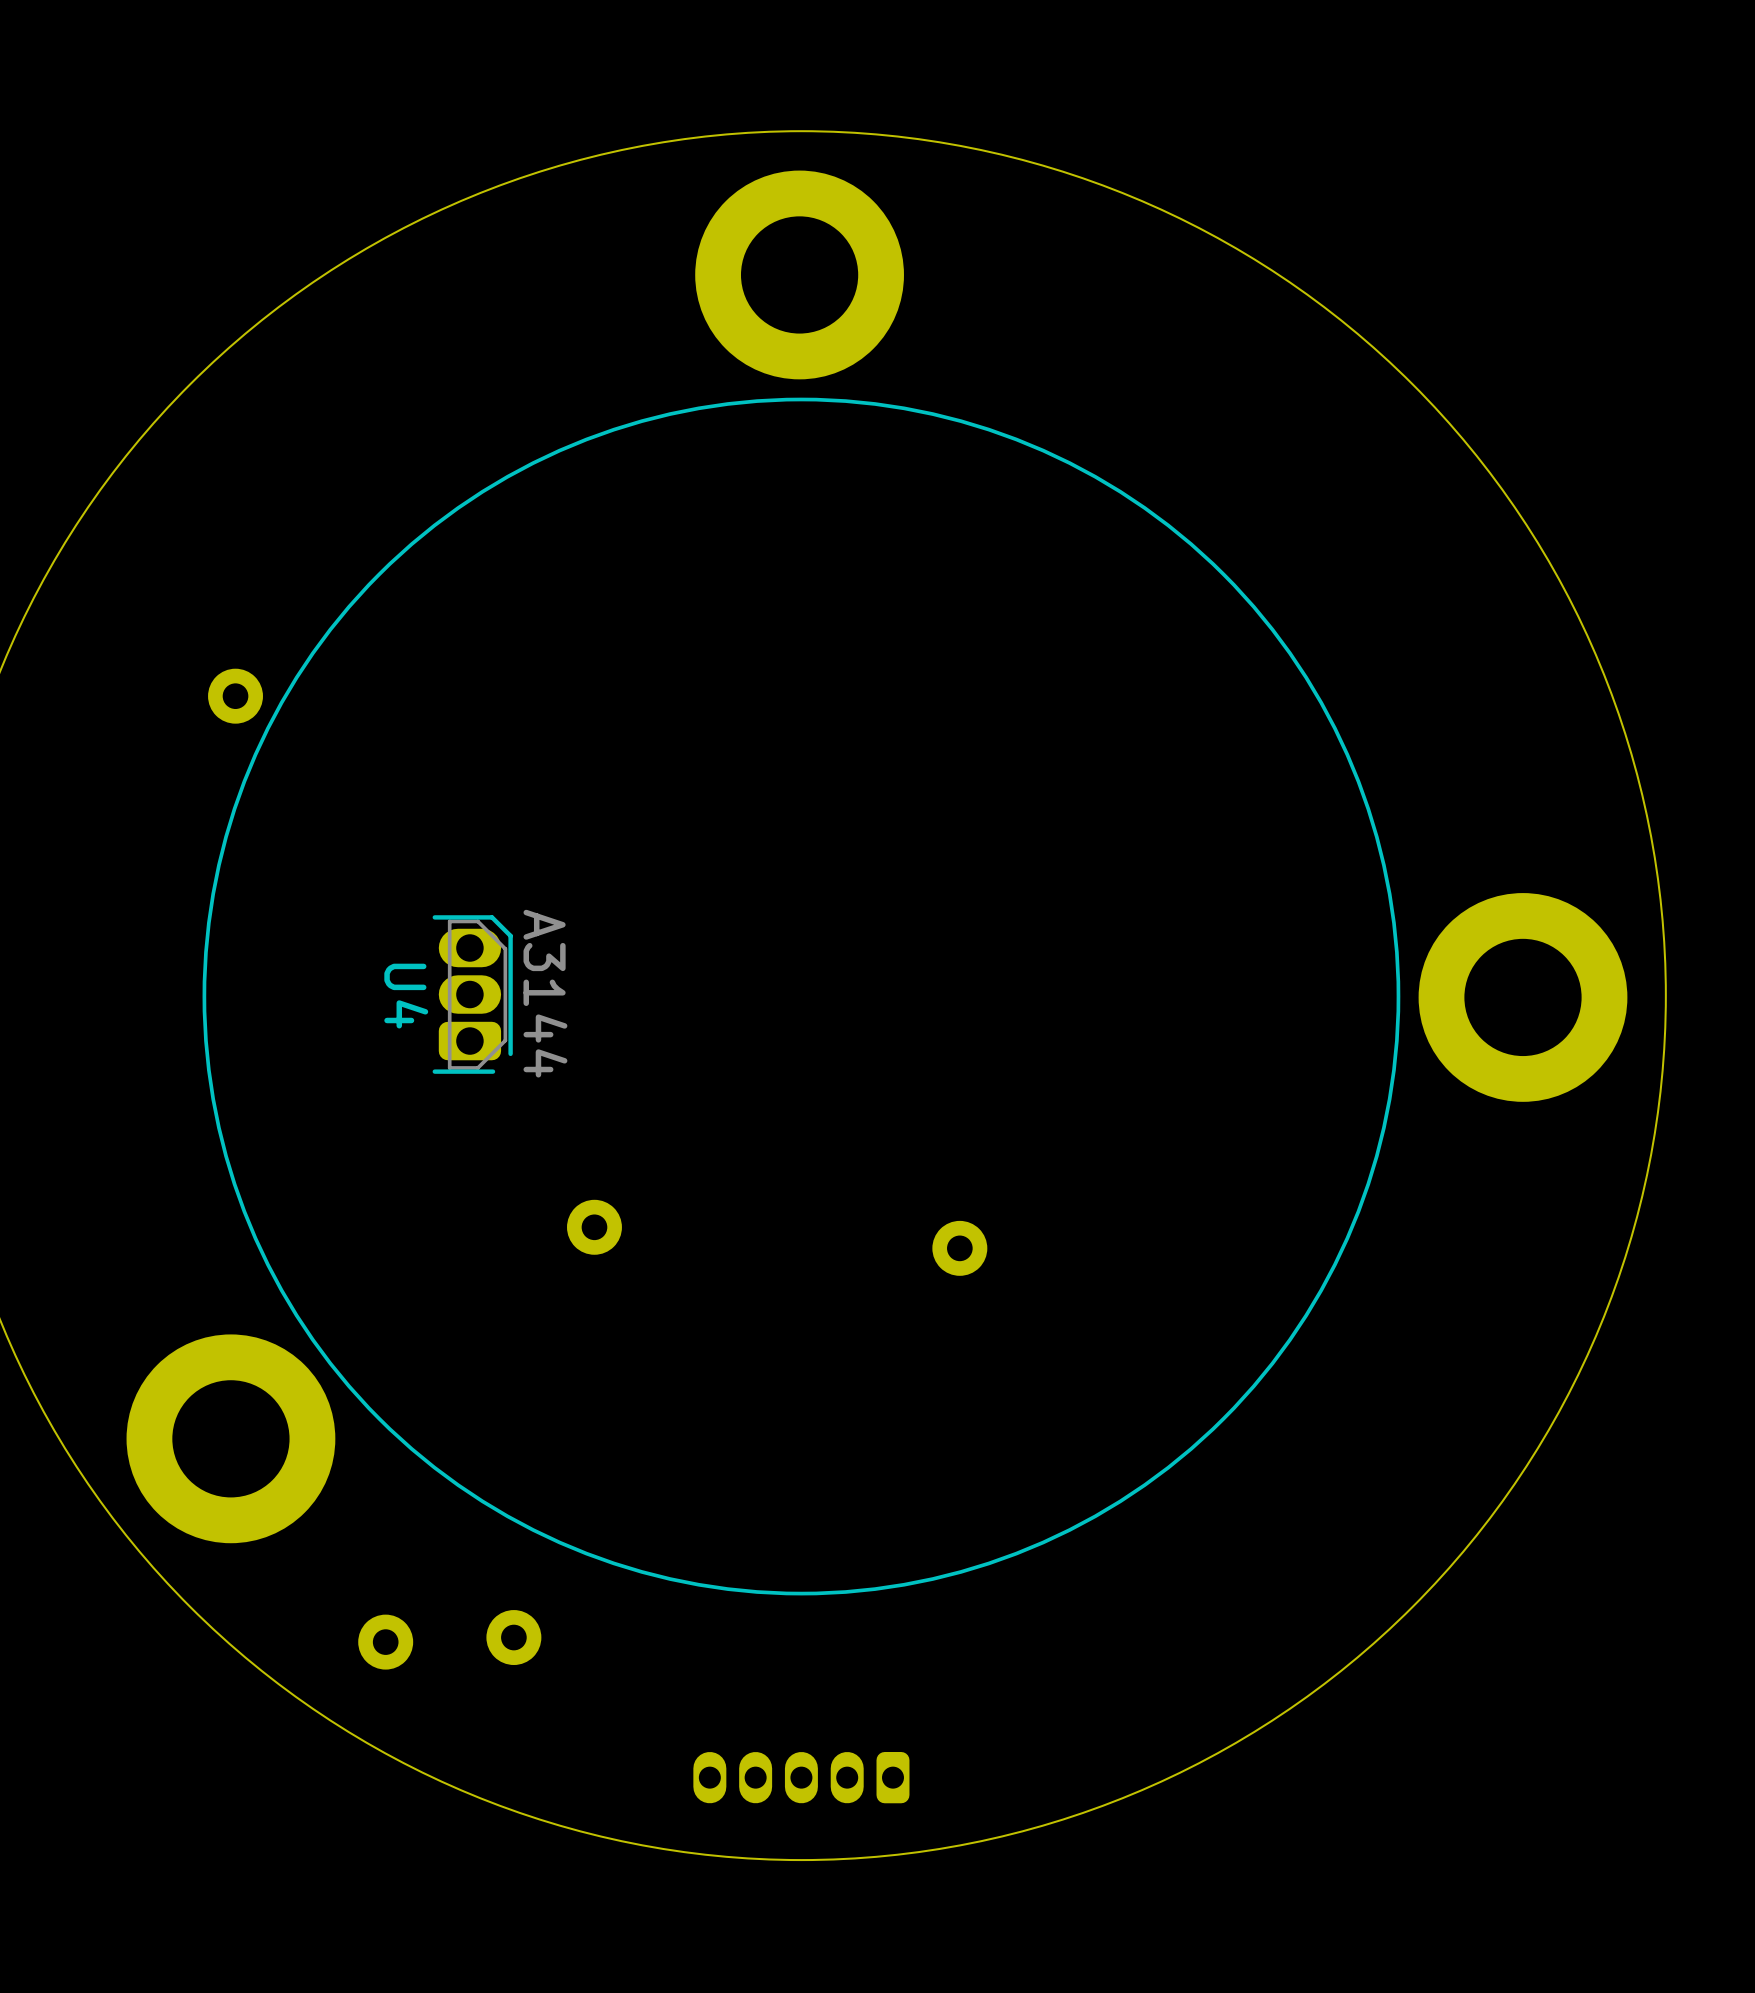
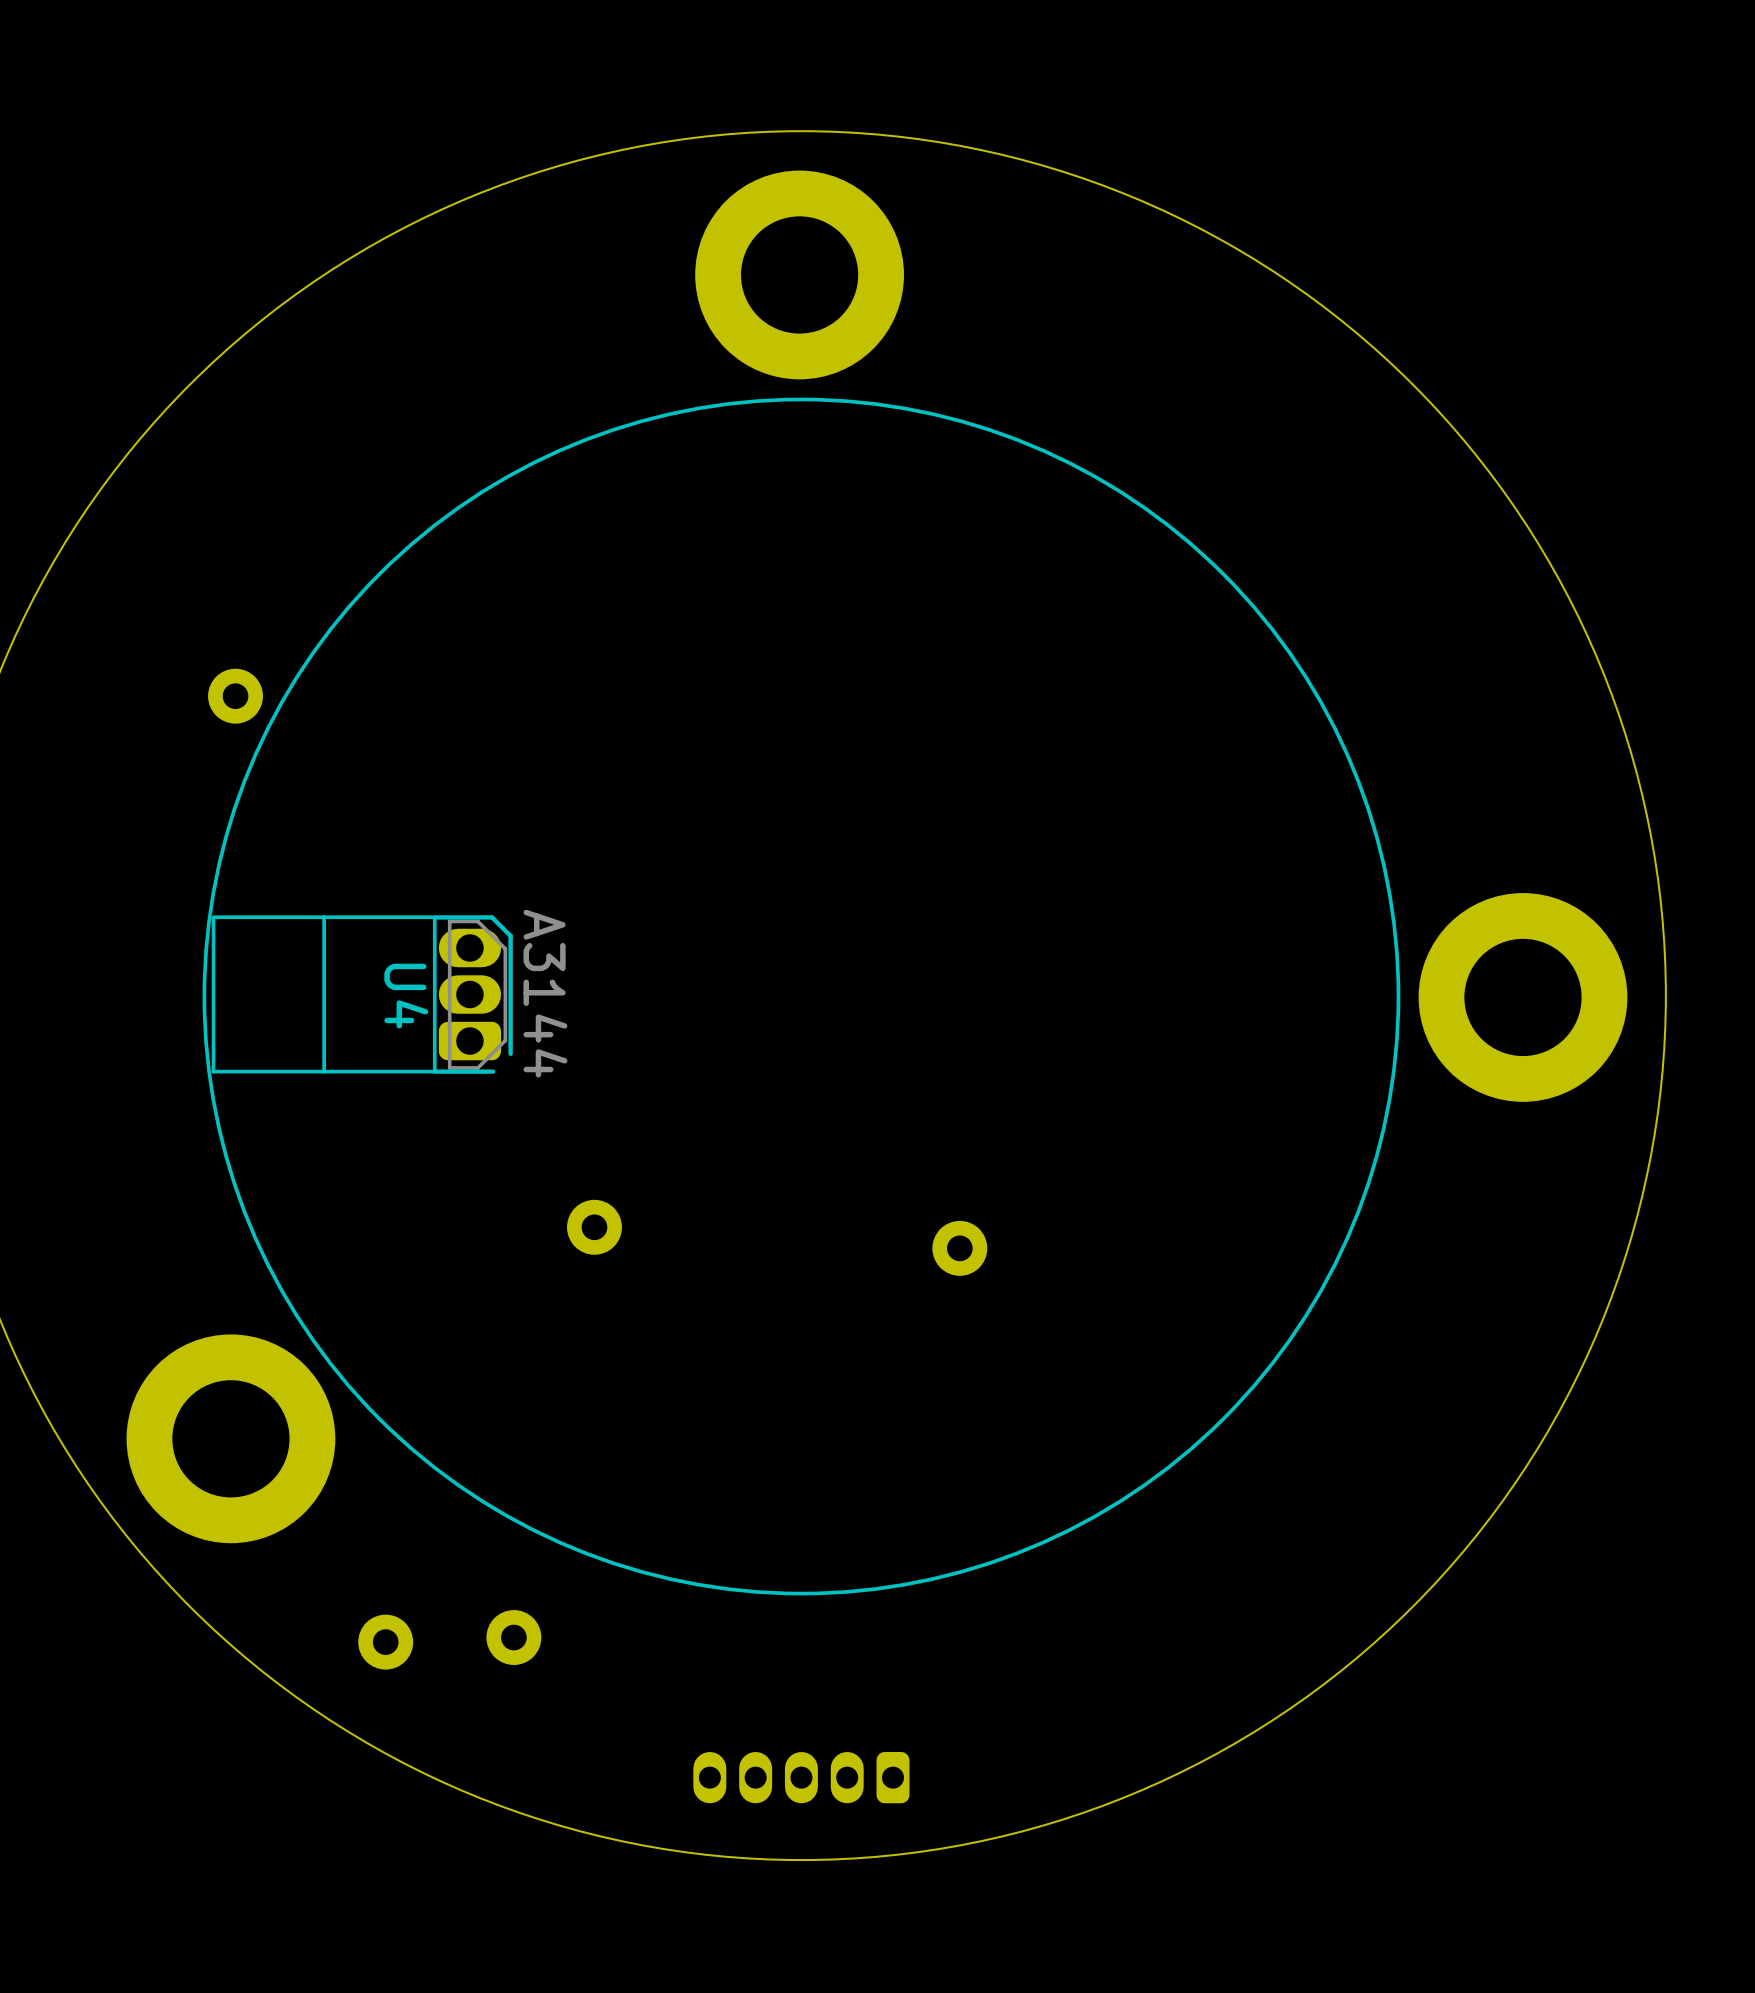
U4 footprint: [432, 915, 513, 1074] -> [211, 915, 513, 1074]

